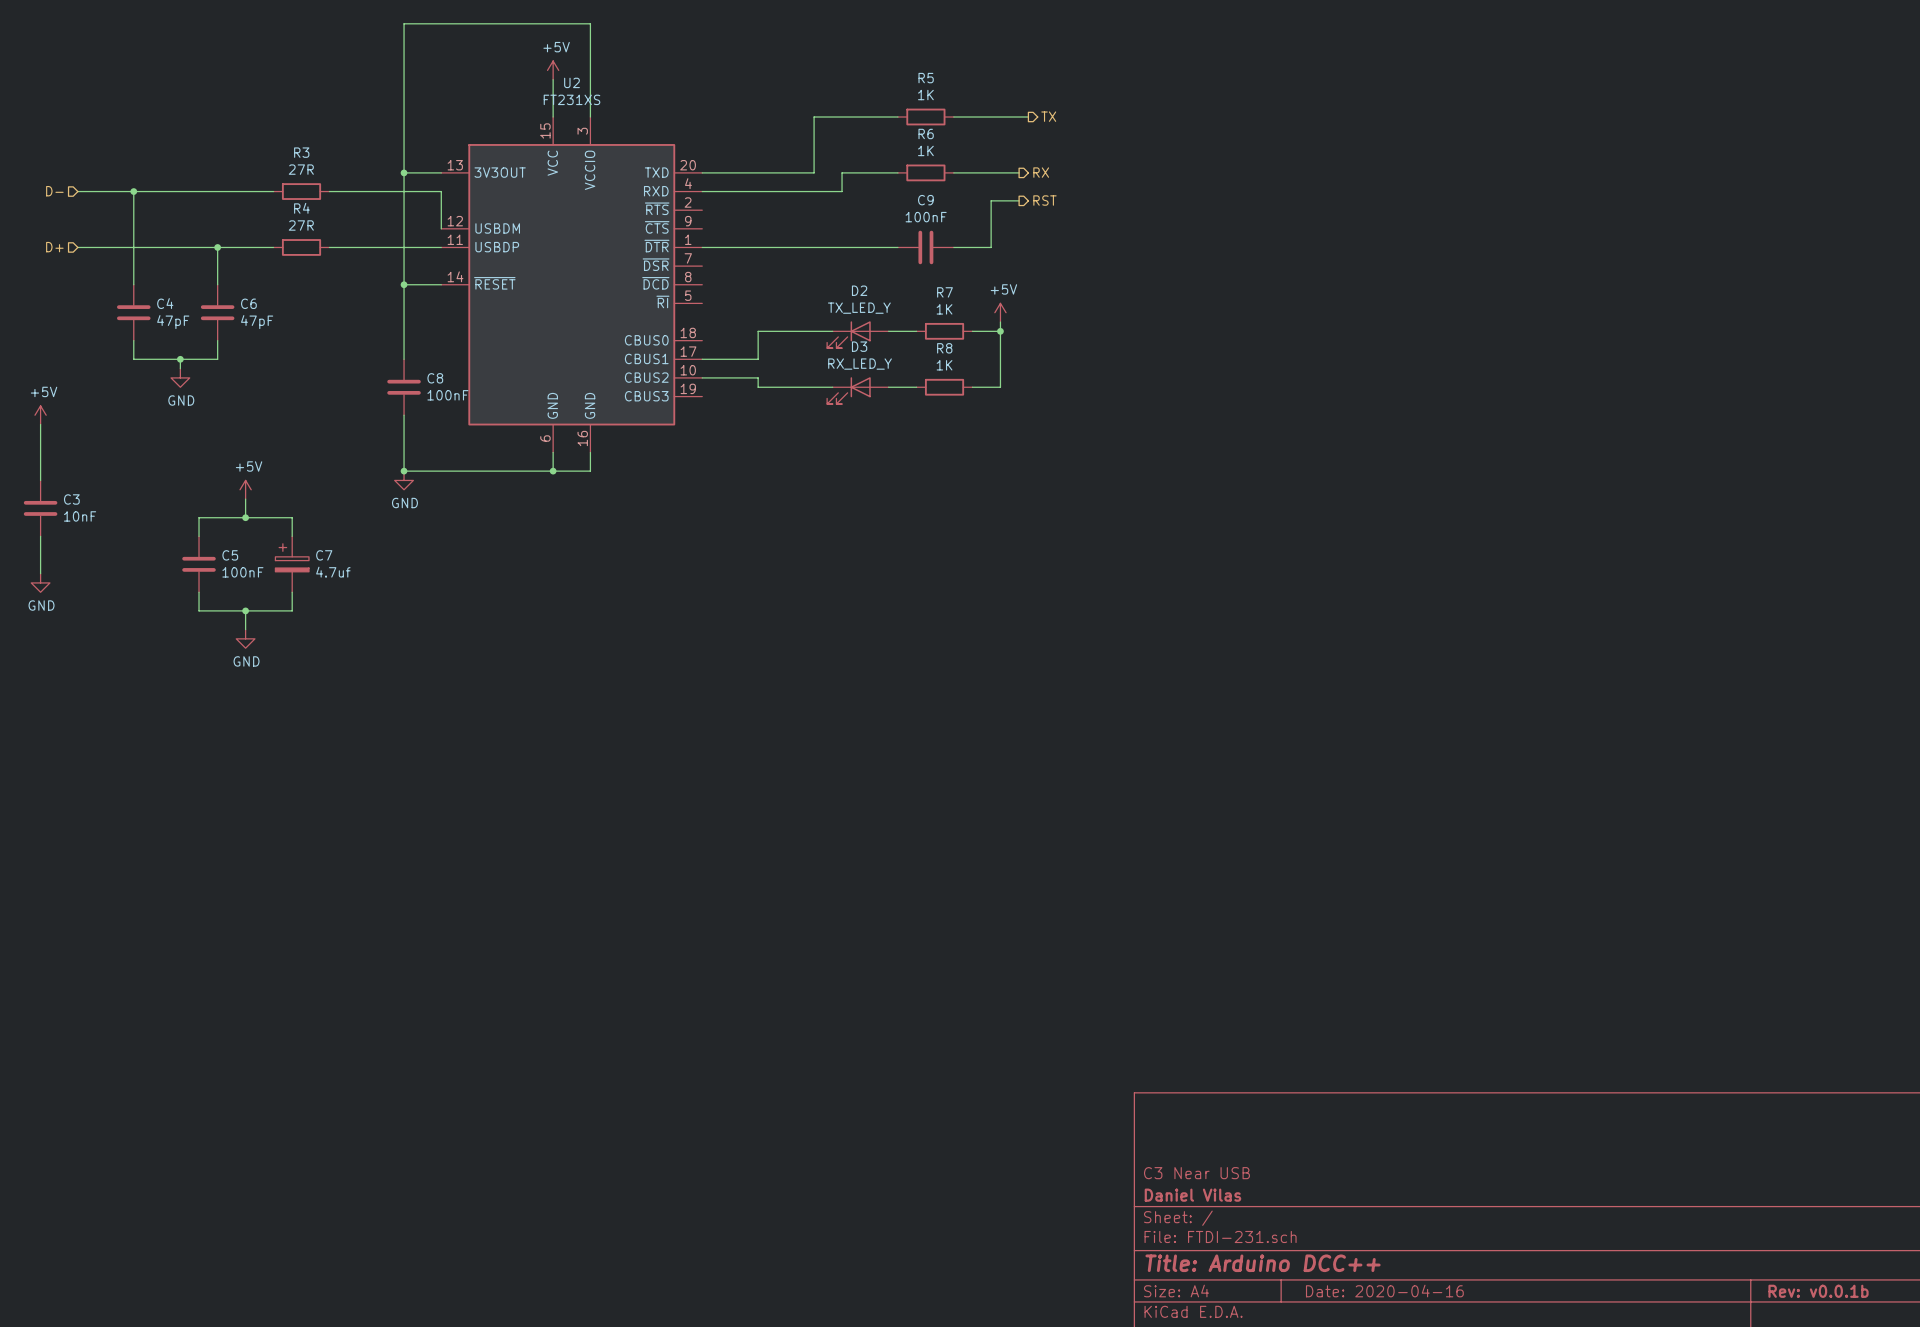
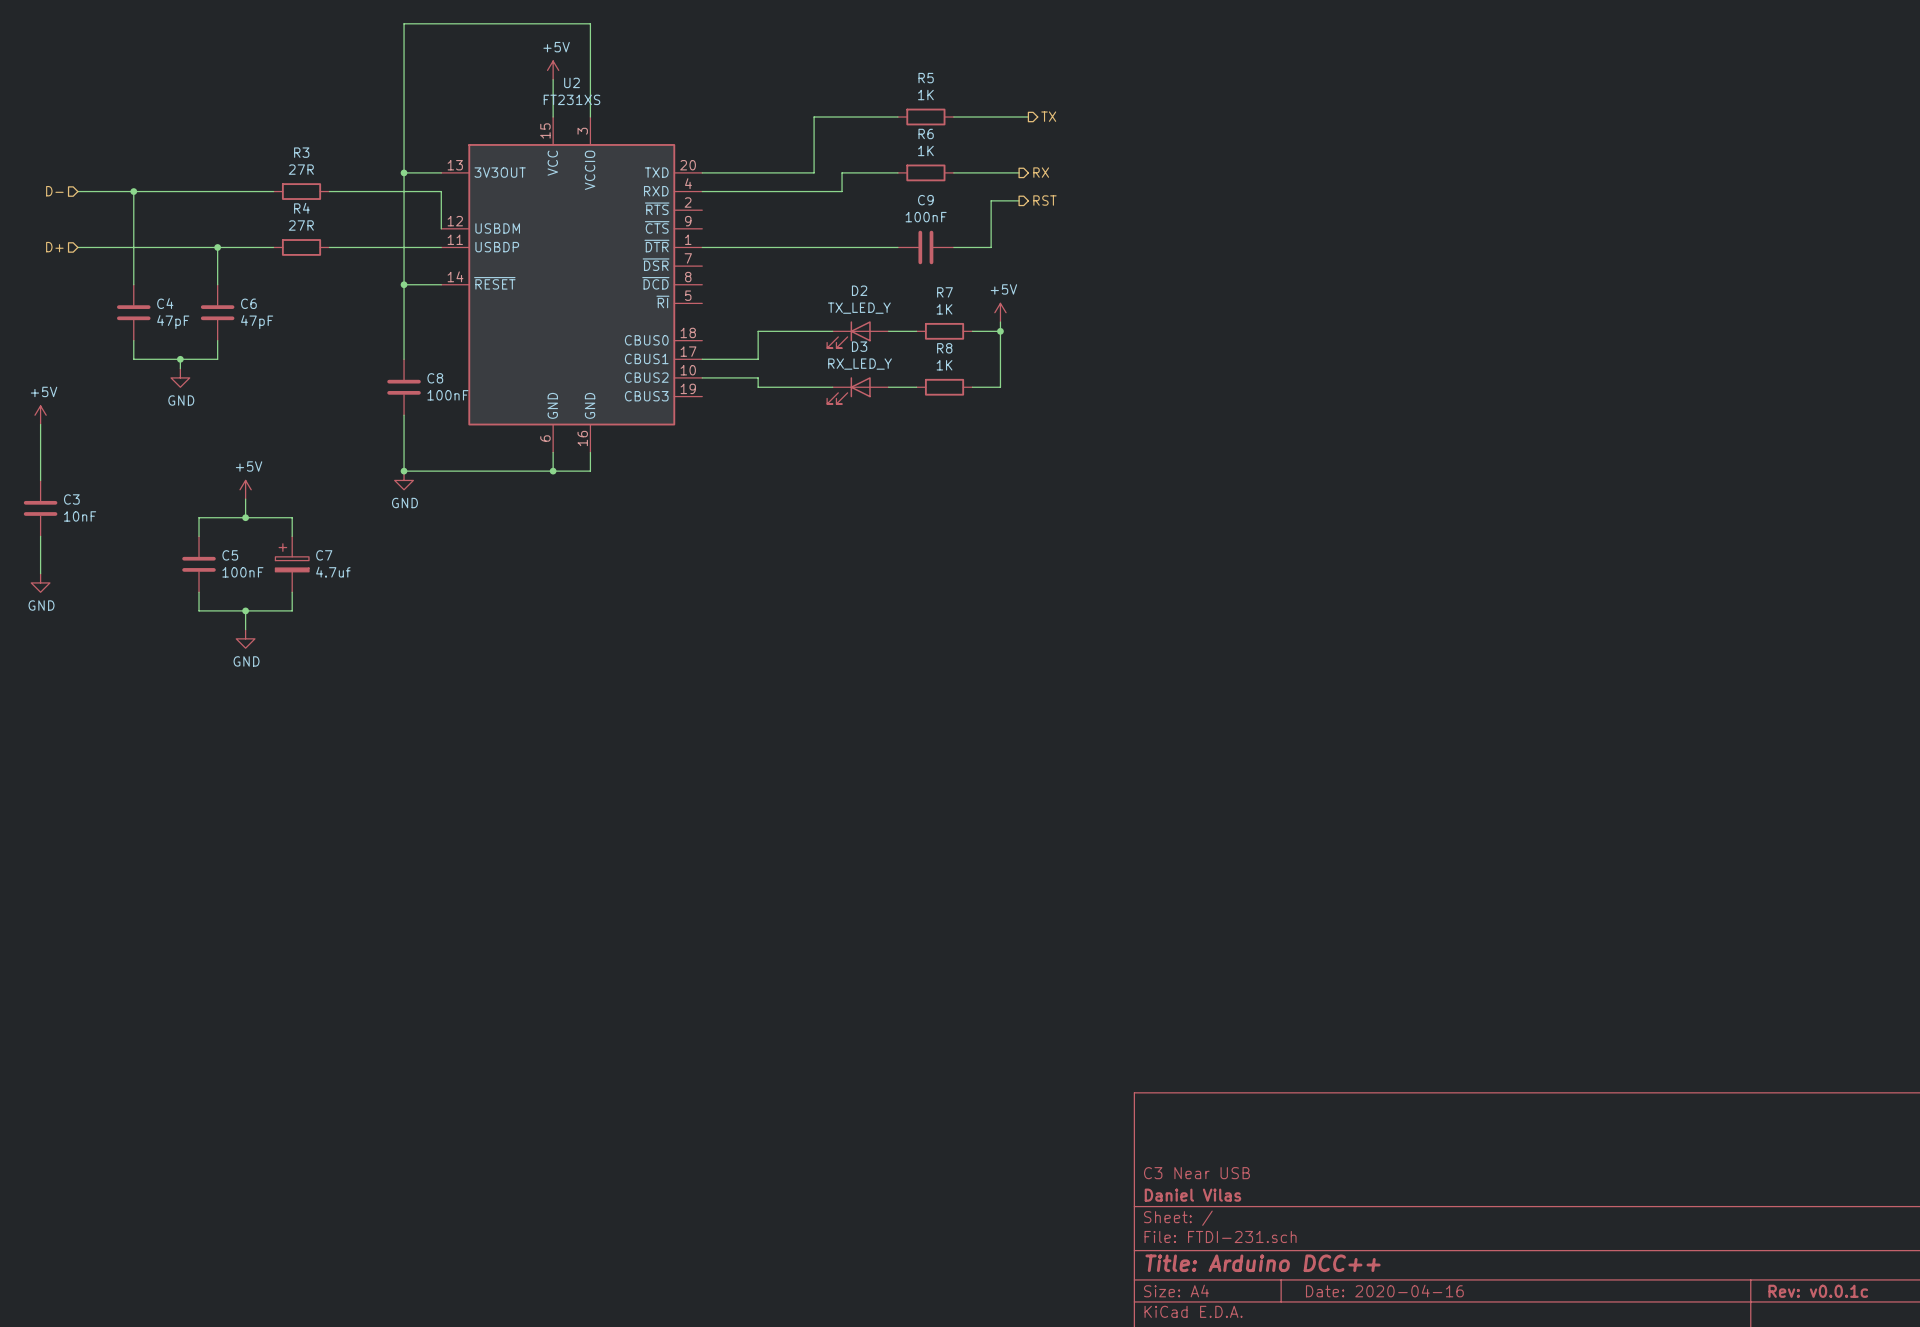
title block: Rev: v0.0.1b (1818, 1291) -> Rev: v0.0.1c (1818, 1291)

